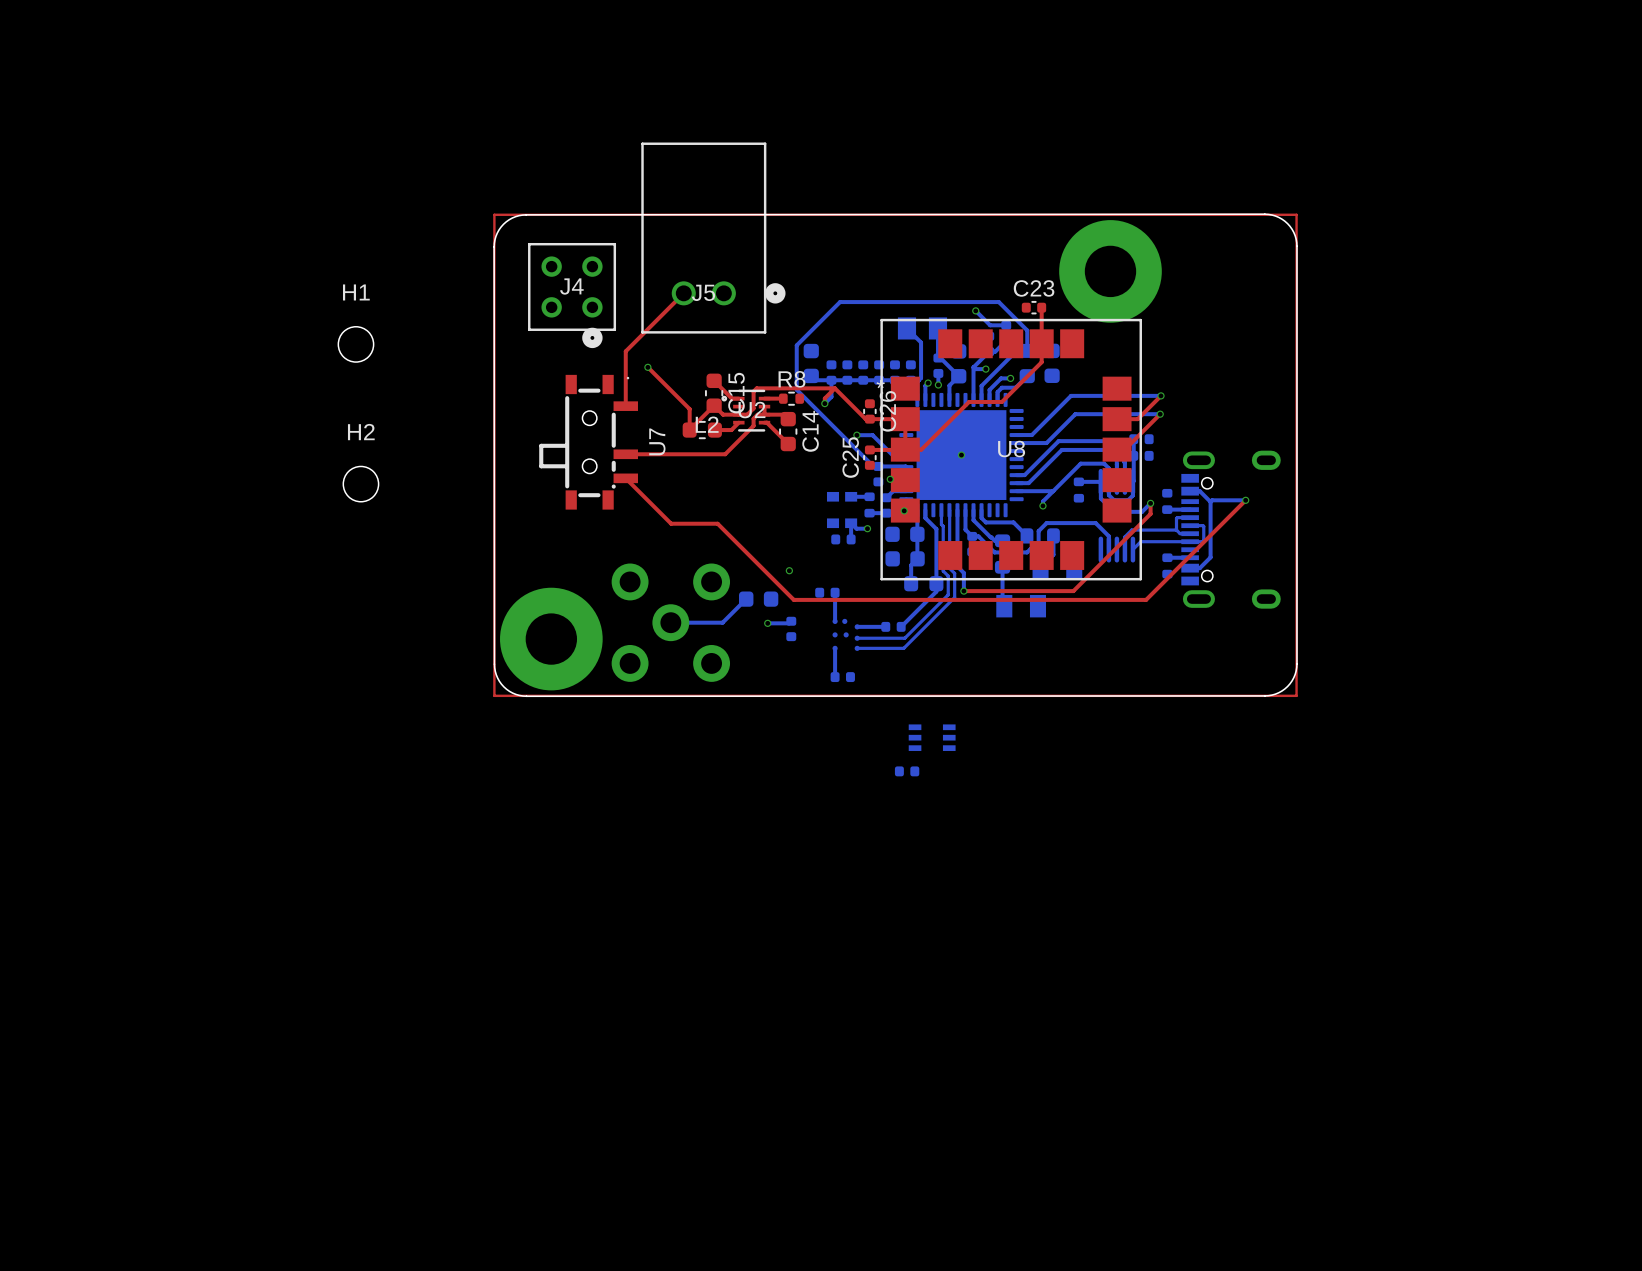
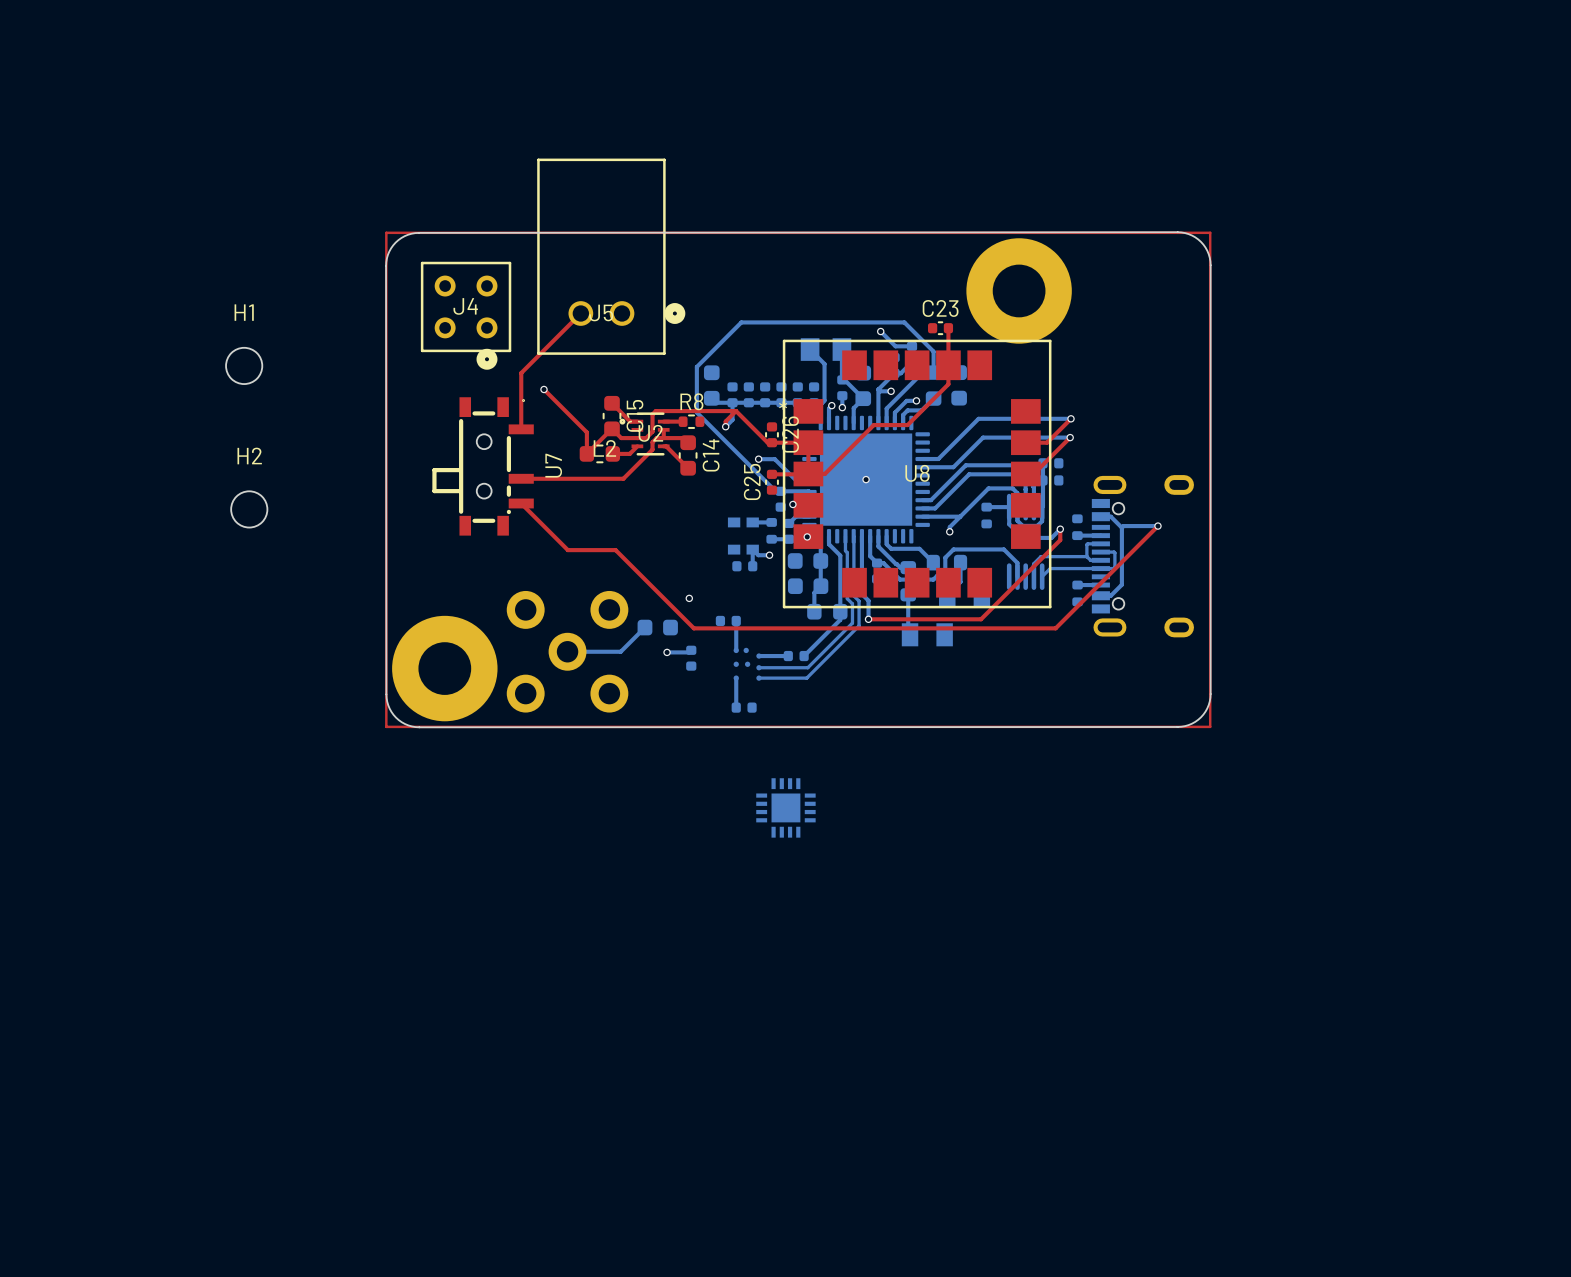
part: (932, 737) -> none
part: (907, 771) -> none
part: none -> (785, 807)

